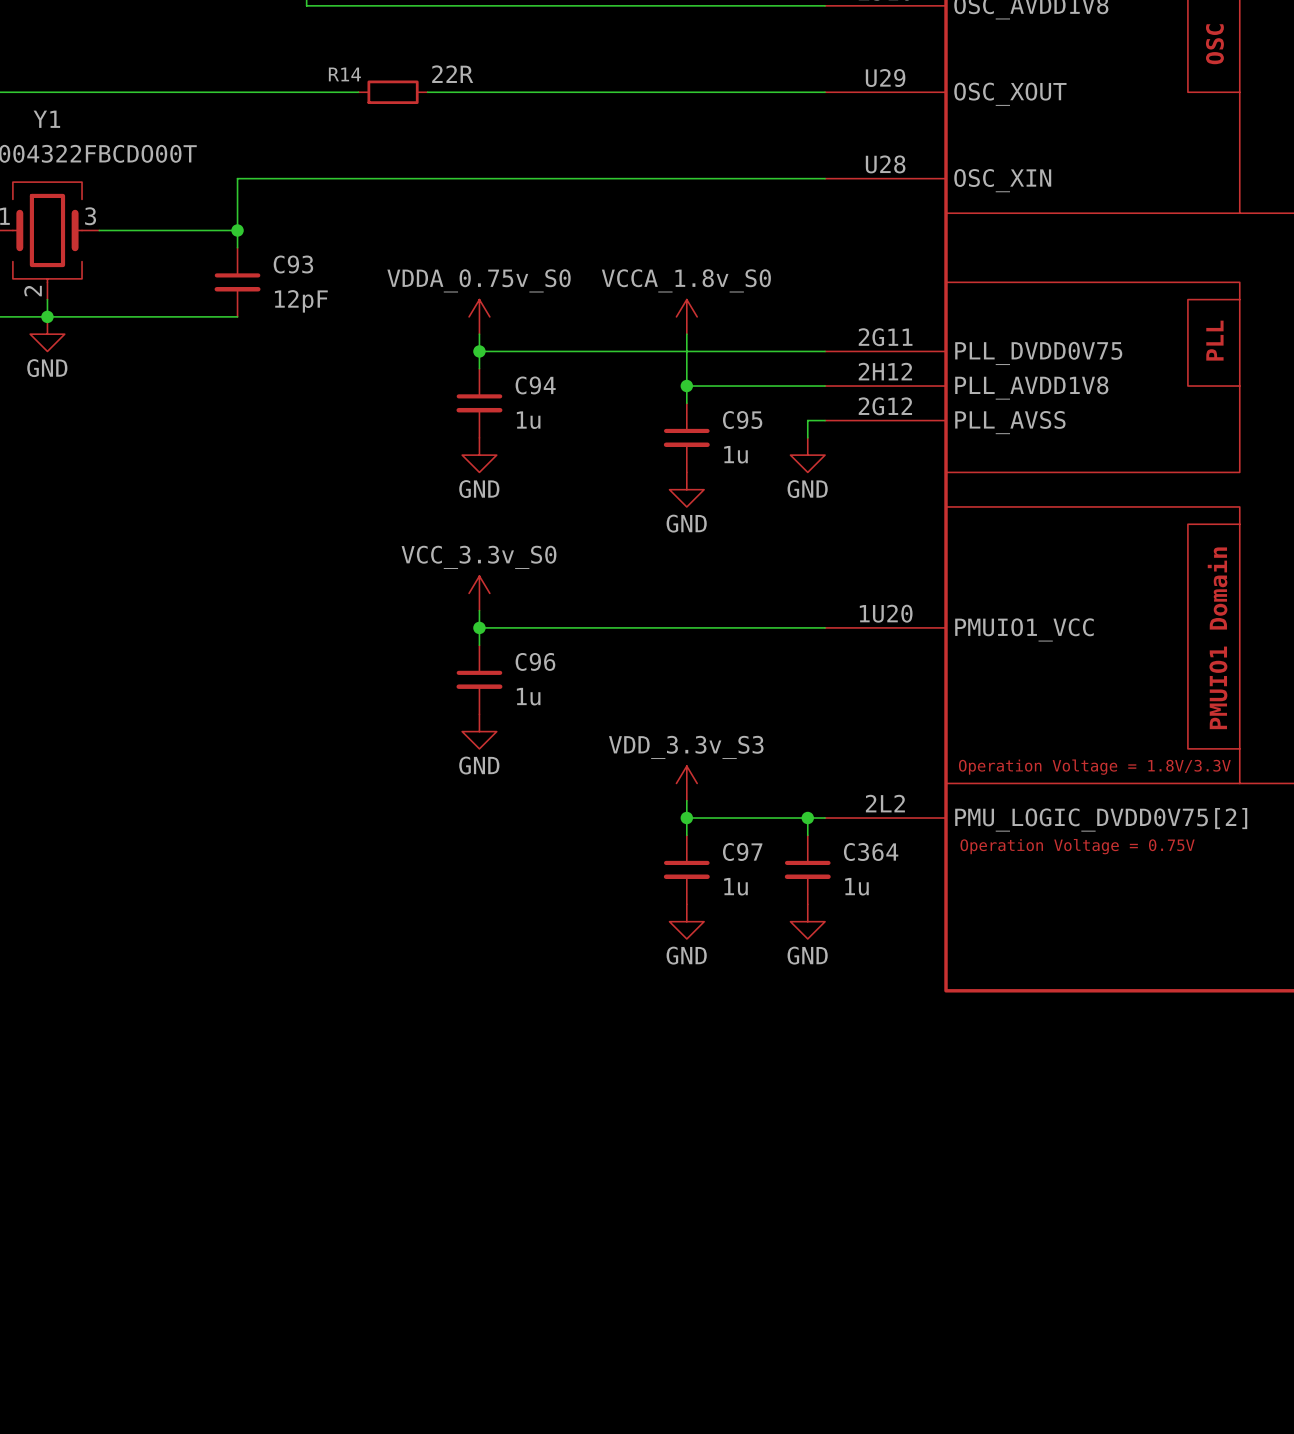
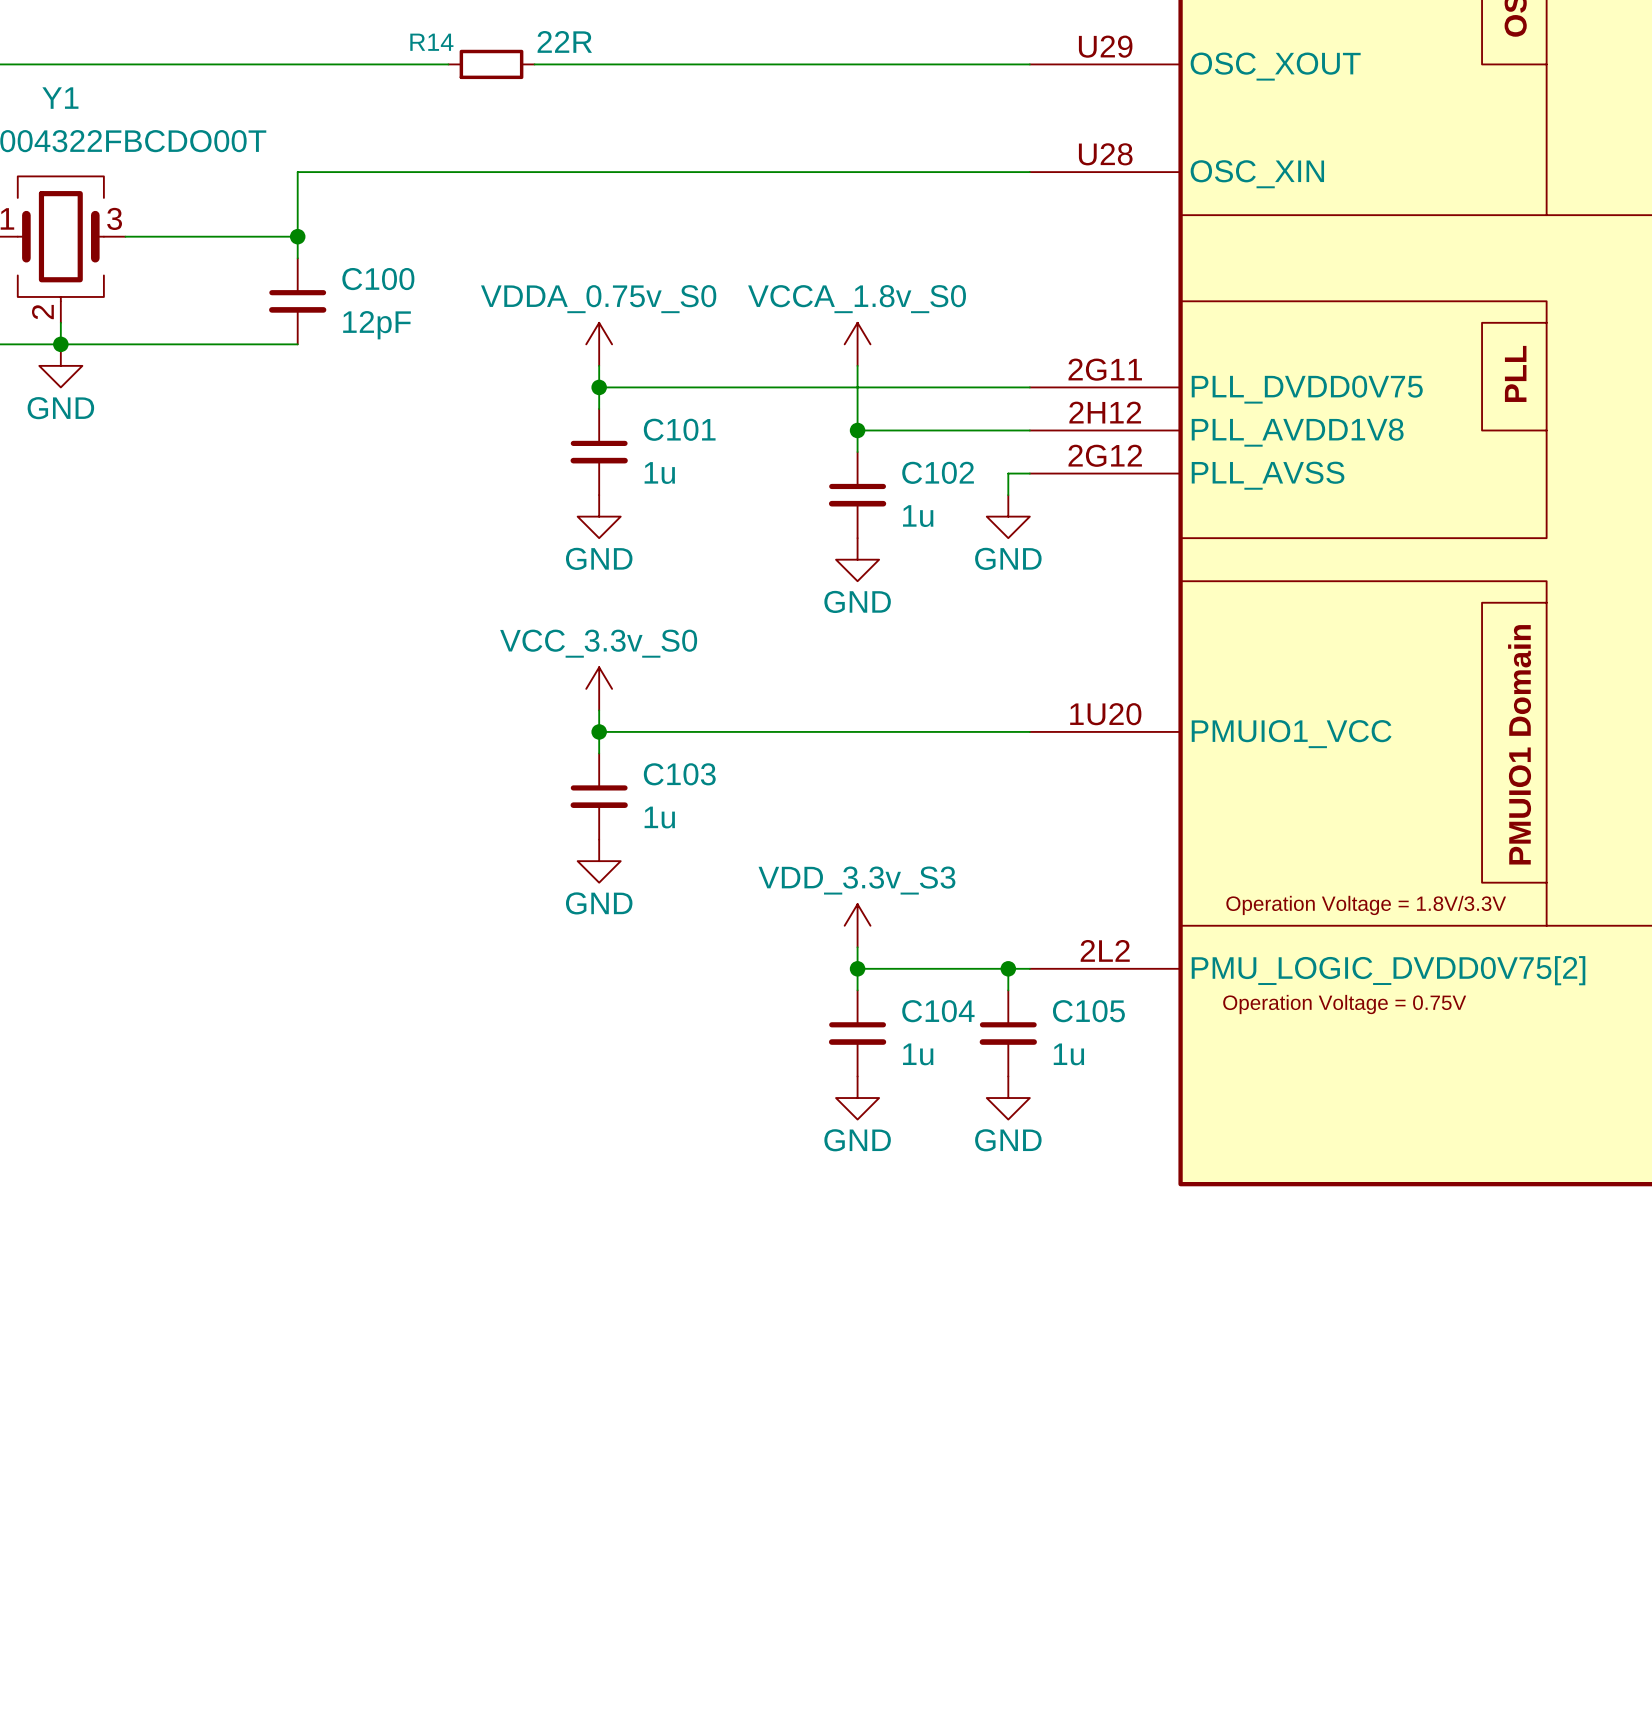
C93 name: C93 (293, 264) -> C100 (378, 279)
C94 name: C94 (535, 385) -> C101 (679, 429)
C95 name: C95 (742, 420) -> C102 (938, 472)
C96 name: C96 (535, 661) -> C103 (679, 774)
C97 name: C97 (742, 852) -> C104 (938, 1011)
C364 name: C364 (871, 852) -> C105 (1088, 1011)

